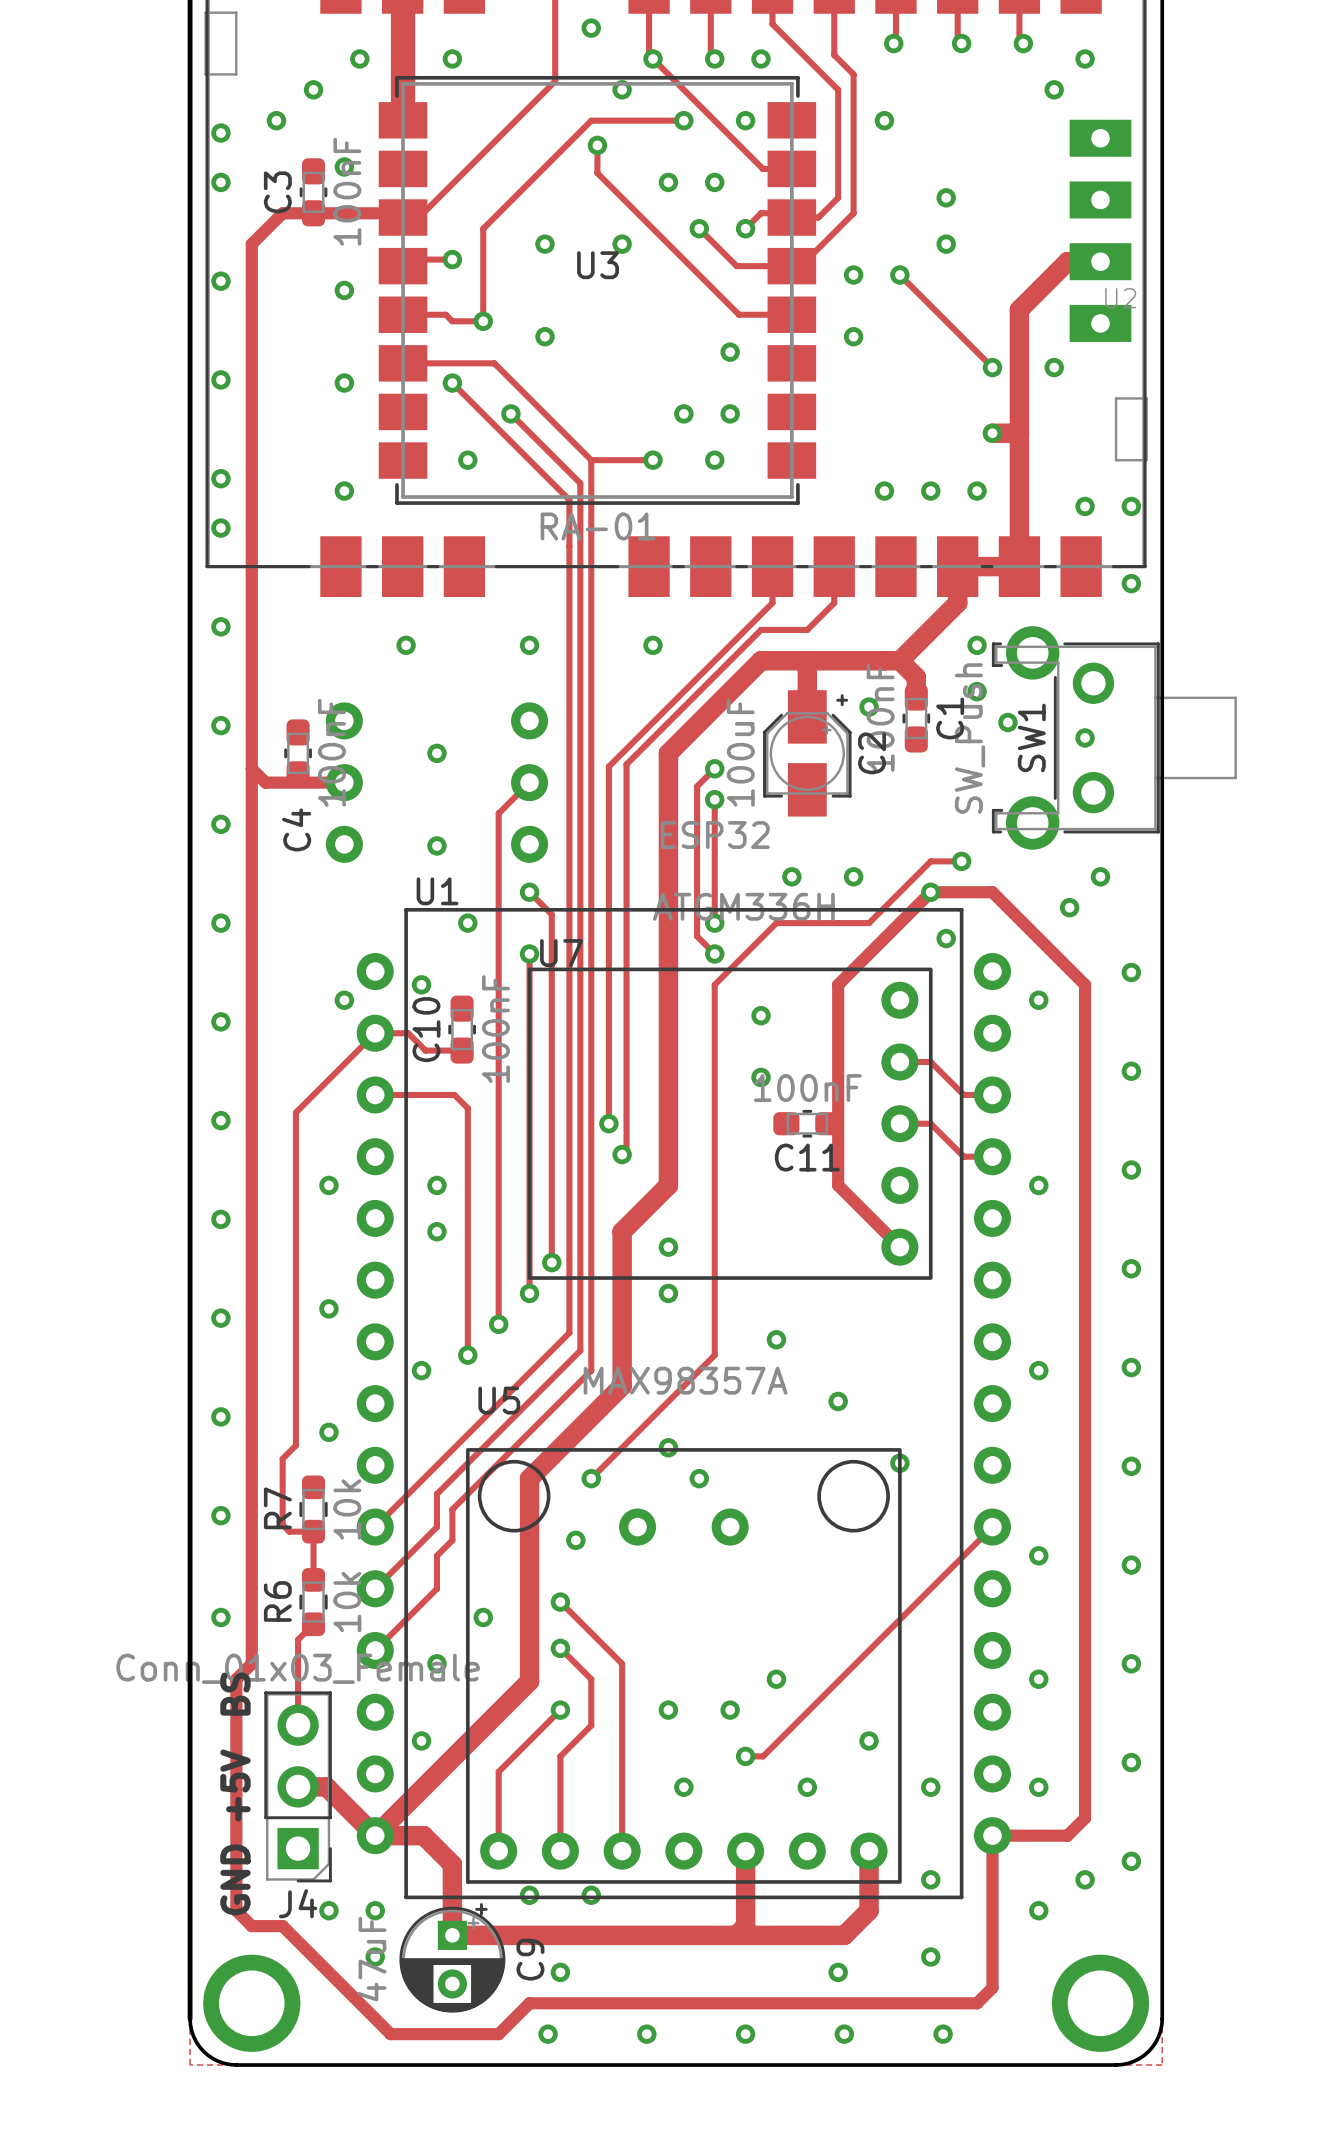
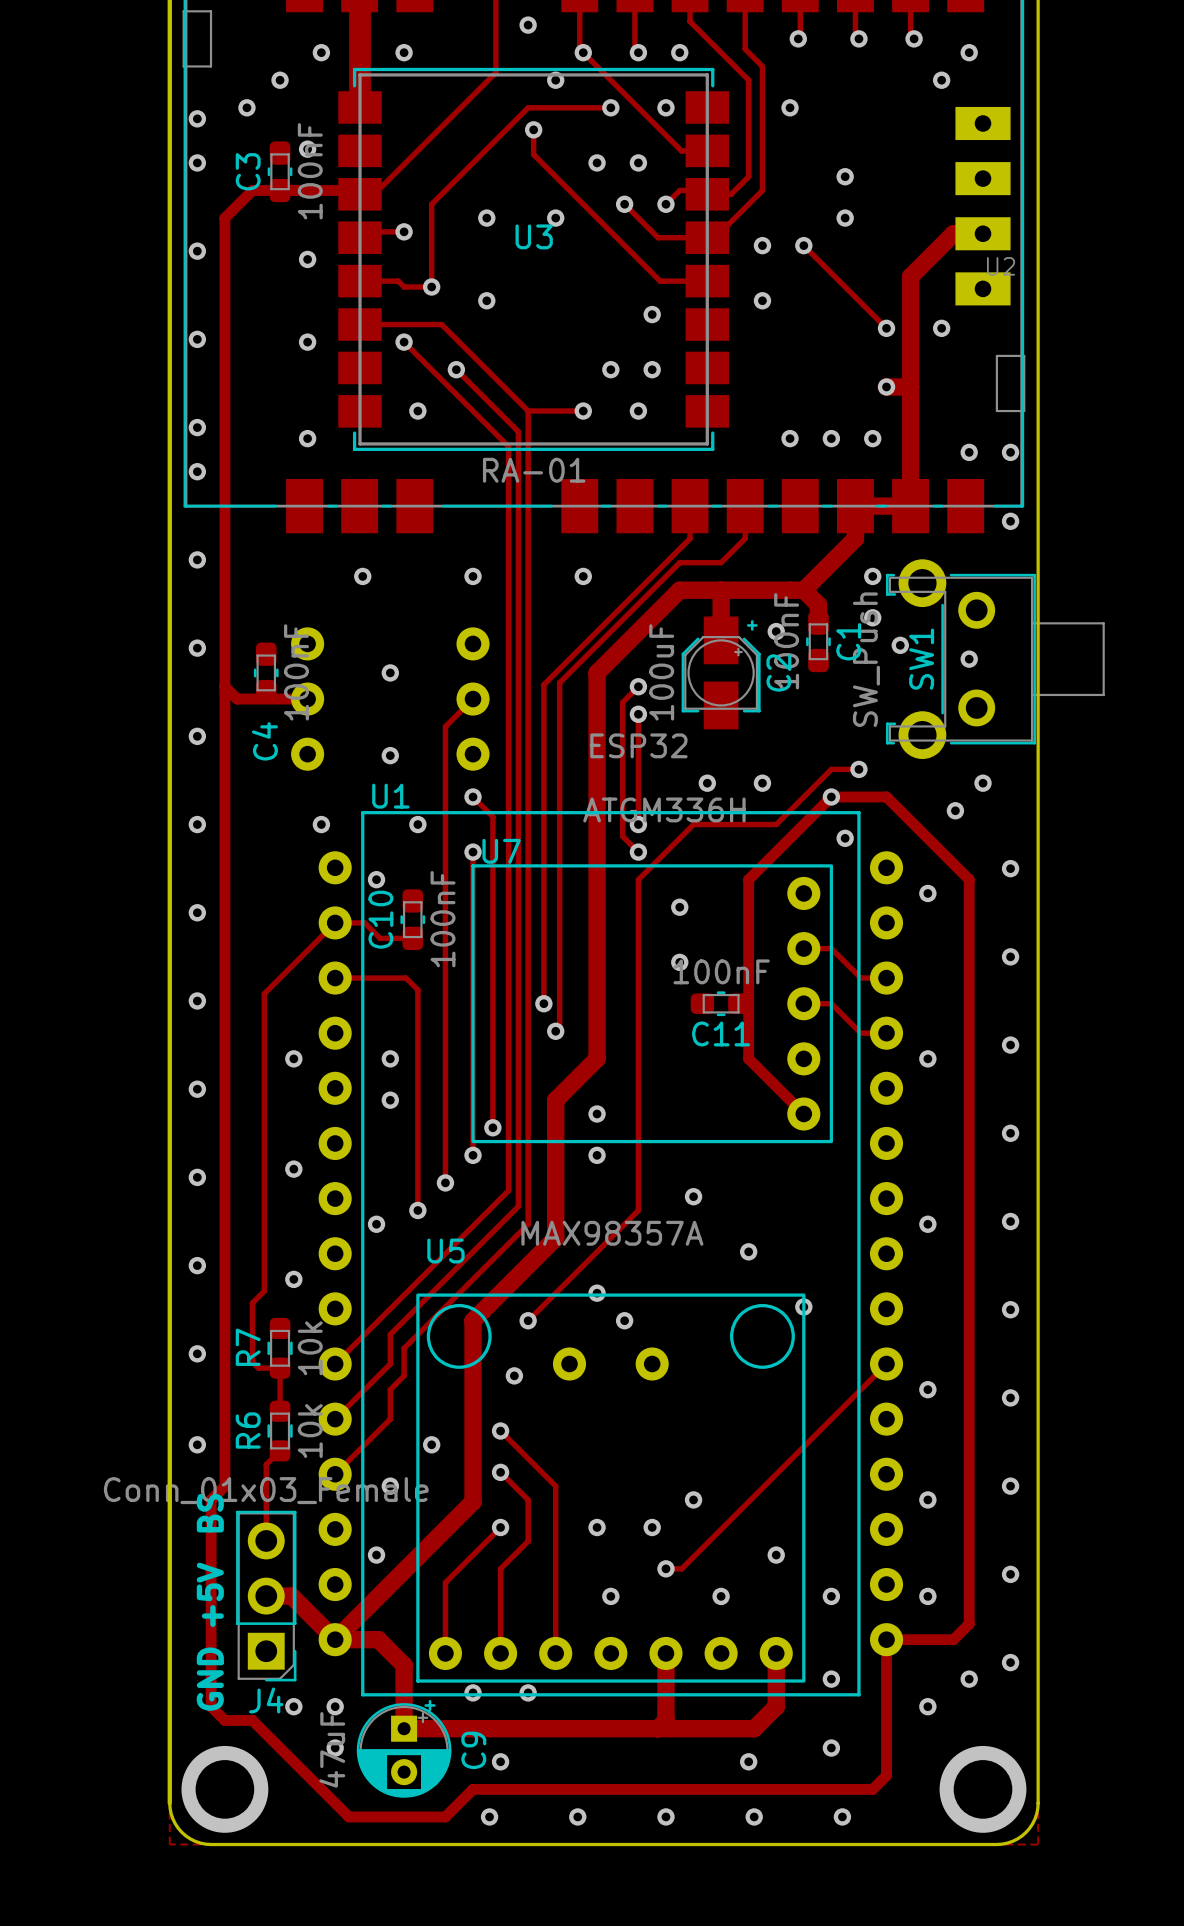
via position: (344, 1000) -> (321, 824)

